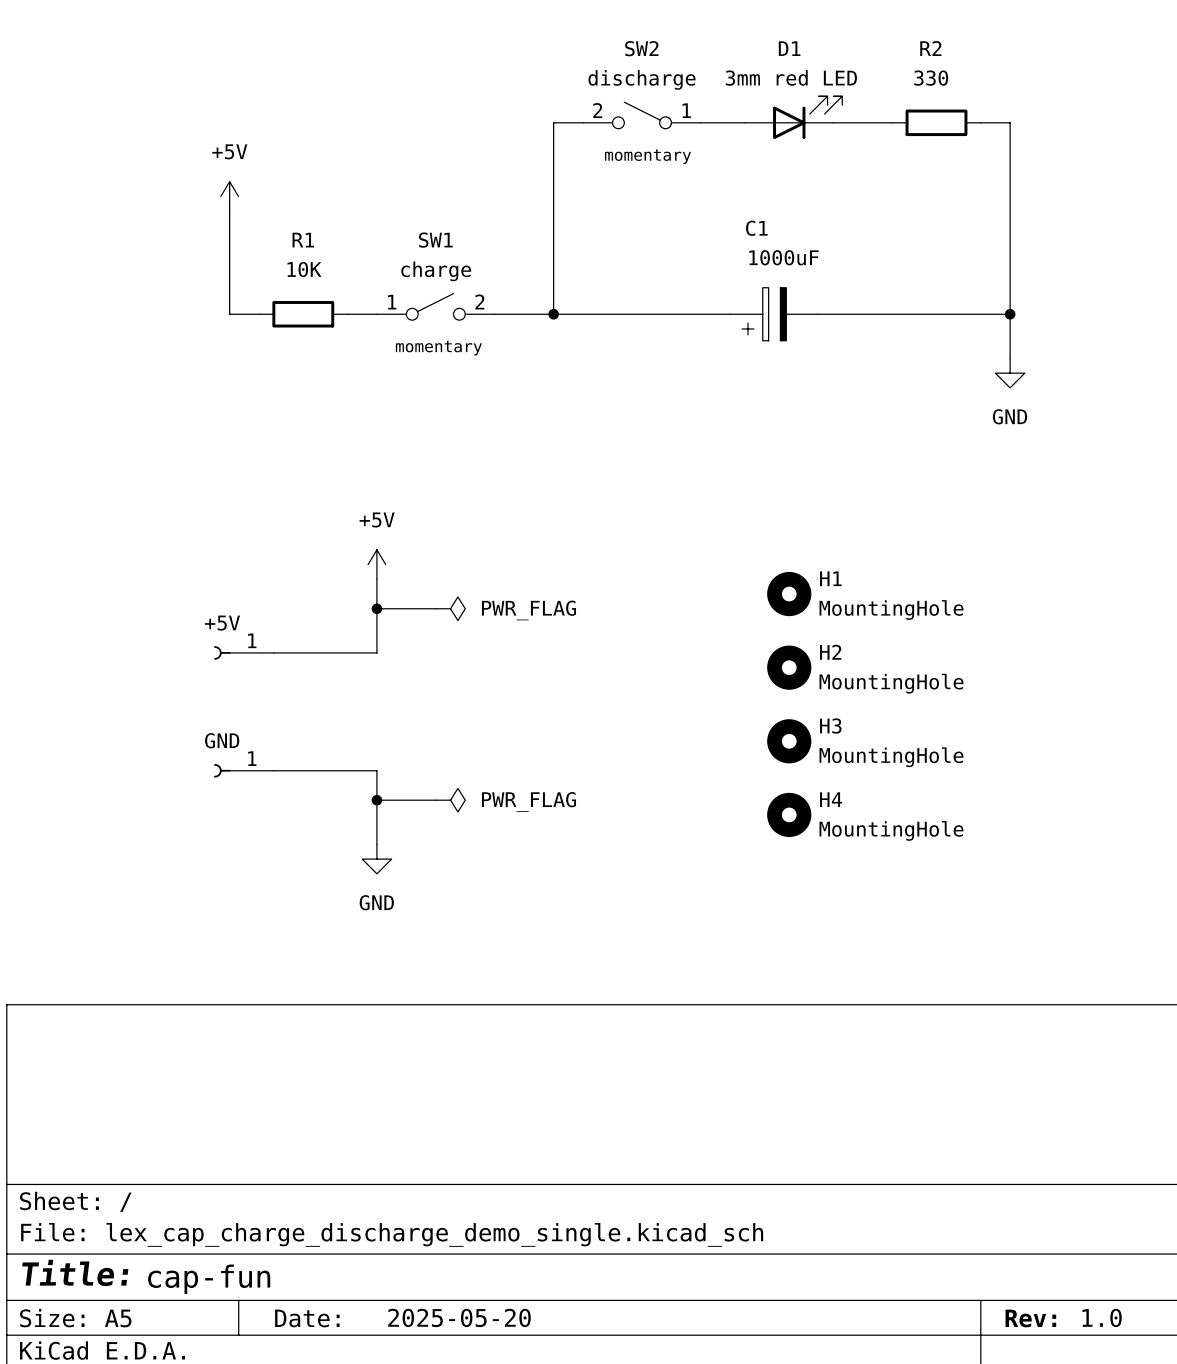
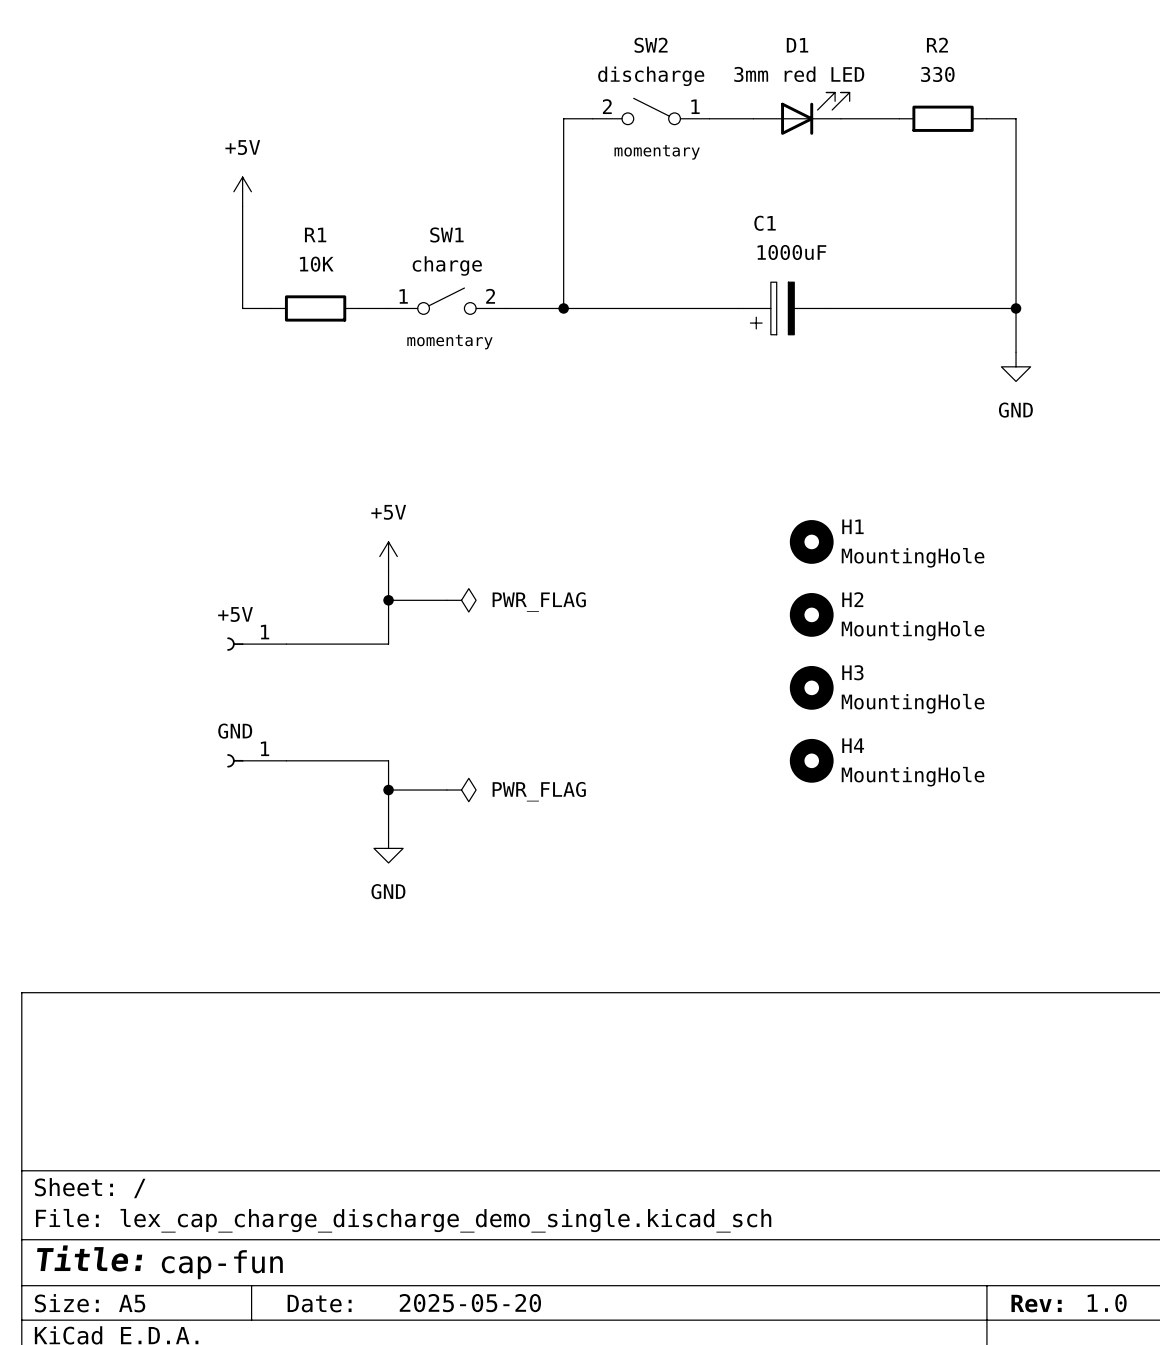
H1 position: (789, 594) -> (811, 541)
H2 position: (789, 667) -> (811, 614)
H3 position: (789, 741) -> (811, 687)
H4 position: (789, 814) -> (811, 760)

